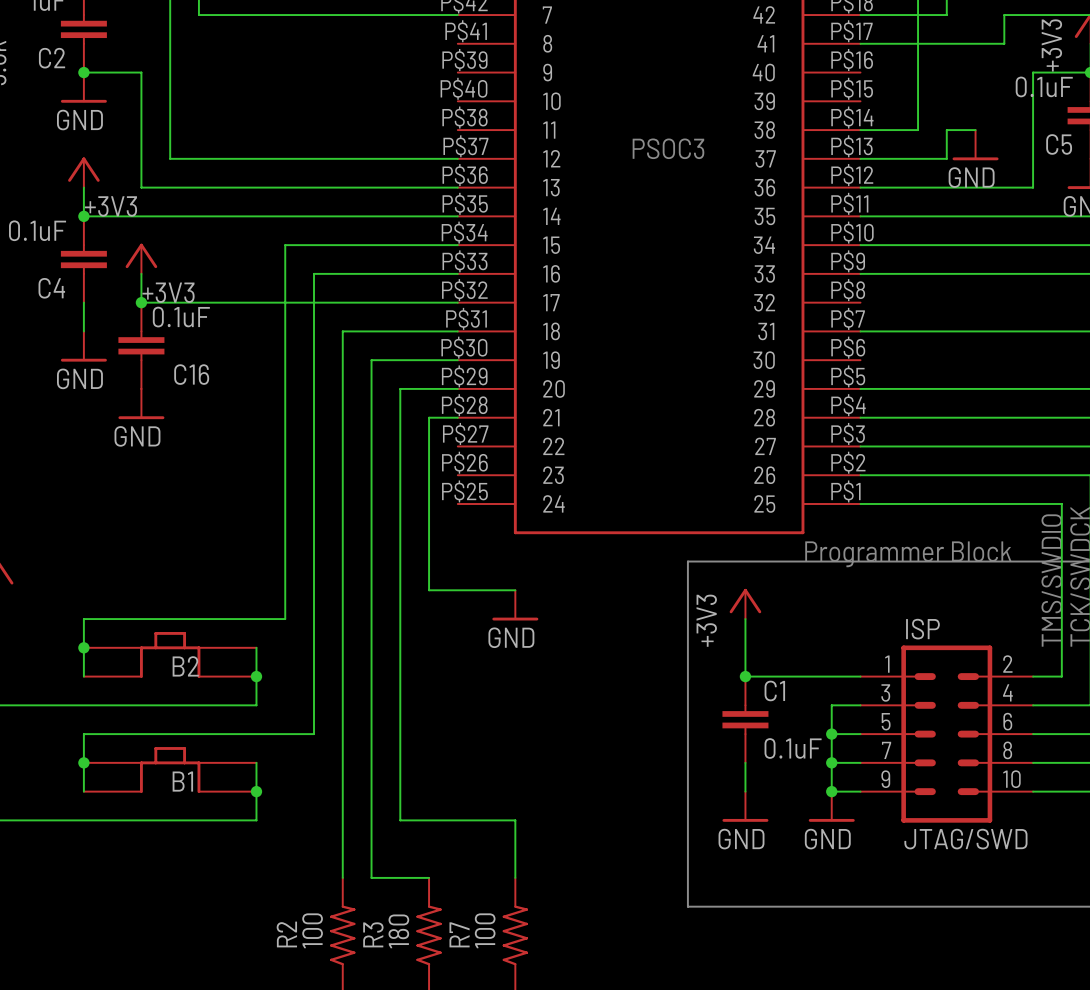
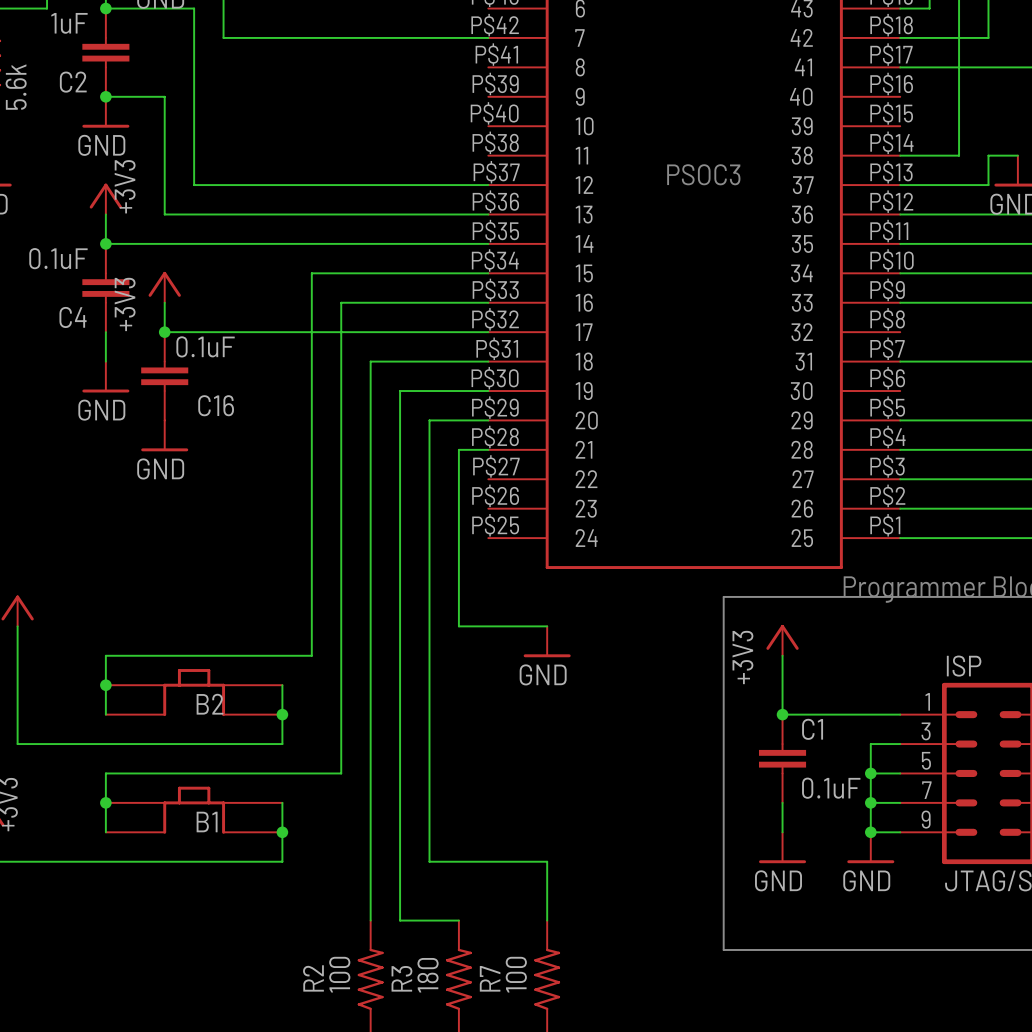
power symbol text rotation: 0° (110, 206) -> 90° counterclockwise (125, 186)
power symbol text rotation: 0° (168, 292) -> 90° counterclockwise (125, 304)
power symbol text position: +3V3 (168, 292) -> +3V3 (125, 304)

